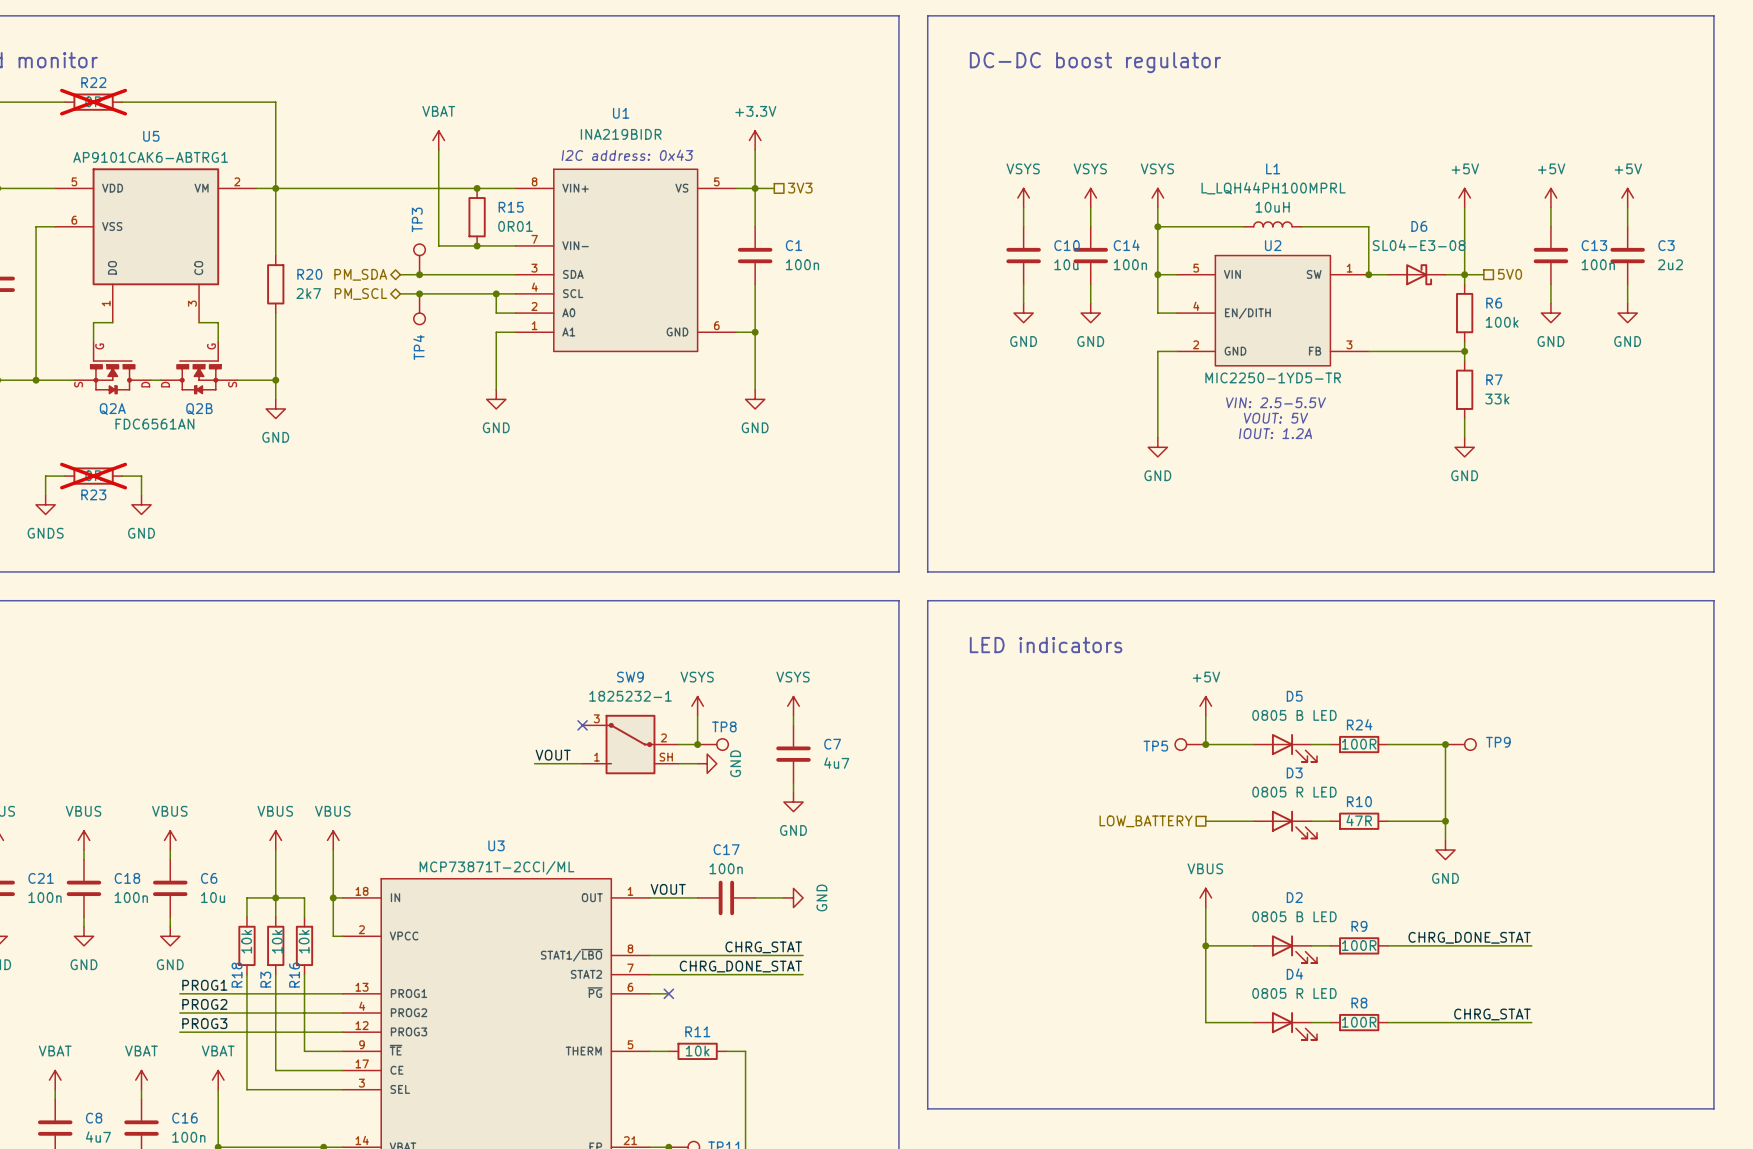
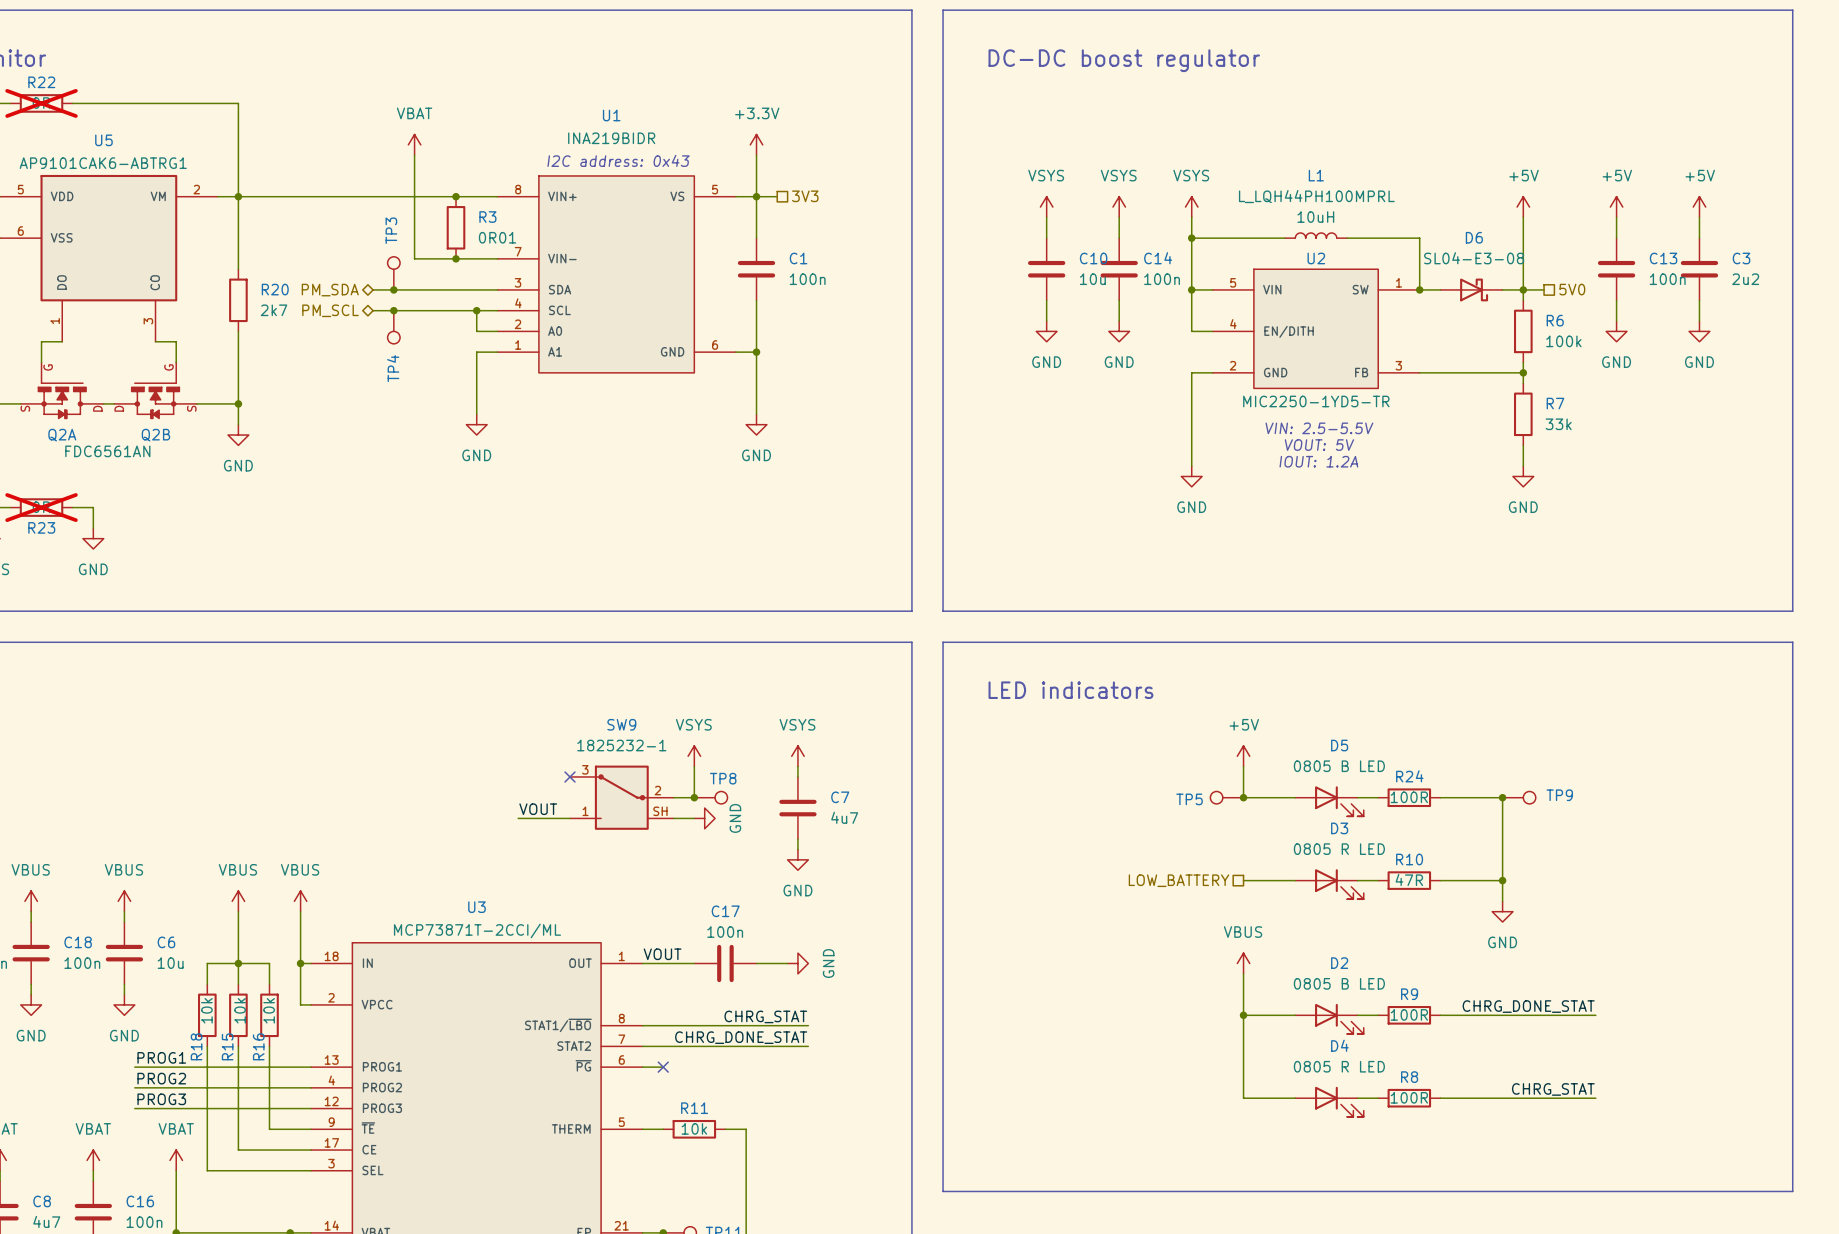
R15 name: R15 (511, 207) -> R3 (487, 217)
R3 name: R3 (265, 979) -> R15 (227, 1046)

